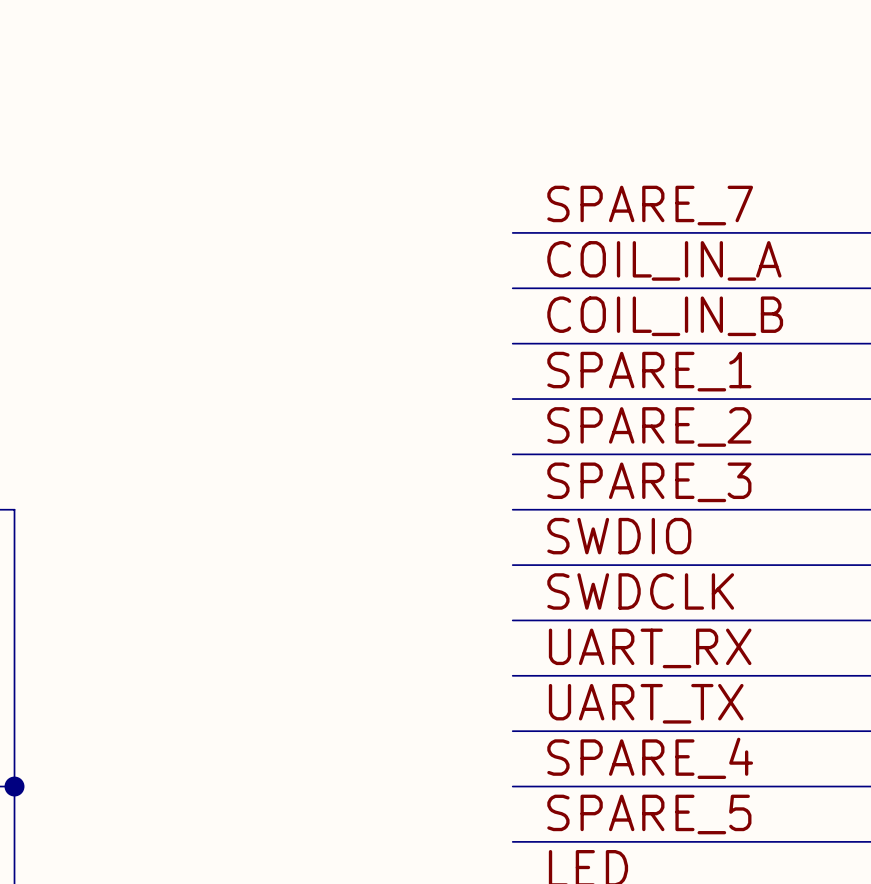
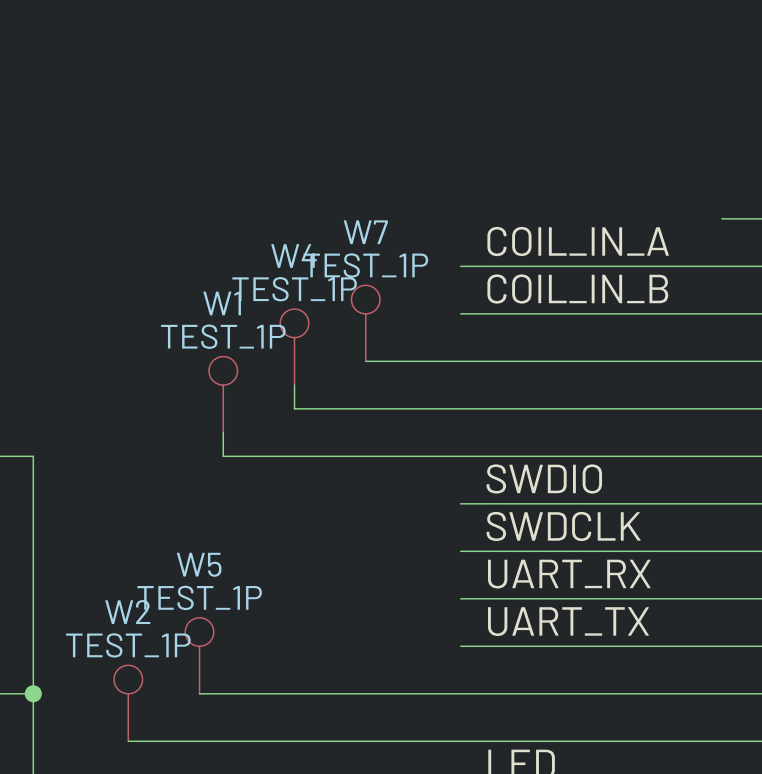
label: SPARE_7 (650, 205) -> none
wire: (512, 232) (817, 232) -> none
W7: none -> TEST_1P (365, 323)
label: SPARE_1 (649, 371) -> none
W4: none -> TEST_1P (294, 347)
wire: none -> (365, 361) (460, 361)
wire: none -> (294, 385) (294, 408) (460, 408)
label: SPARE_2 (649, 426) -> none
W1: none -> TEST_1P (223, 394)
wire: none -> (223, 432) (223, 456) (460, 456)
label: SPARE_3 (649, 482) -> none
W5: none -> TEST_1P (199, 655)
label: SPARE_4 (650, 758) -> none
wire: none -> (199, 693) (460, 693)
W2: none -> TEST_1P (128, 703)
label: SPARE_5 (649, 814) -> none
wire: none -> (128, 741) (460, 741)

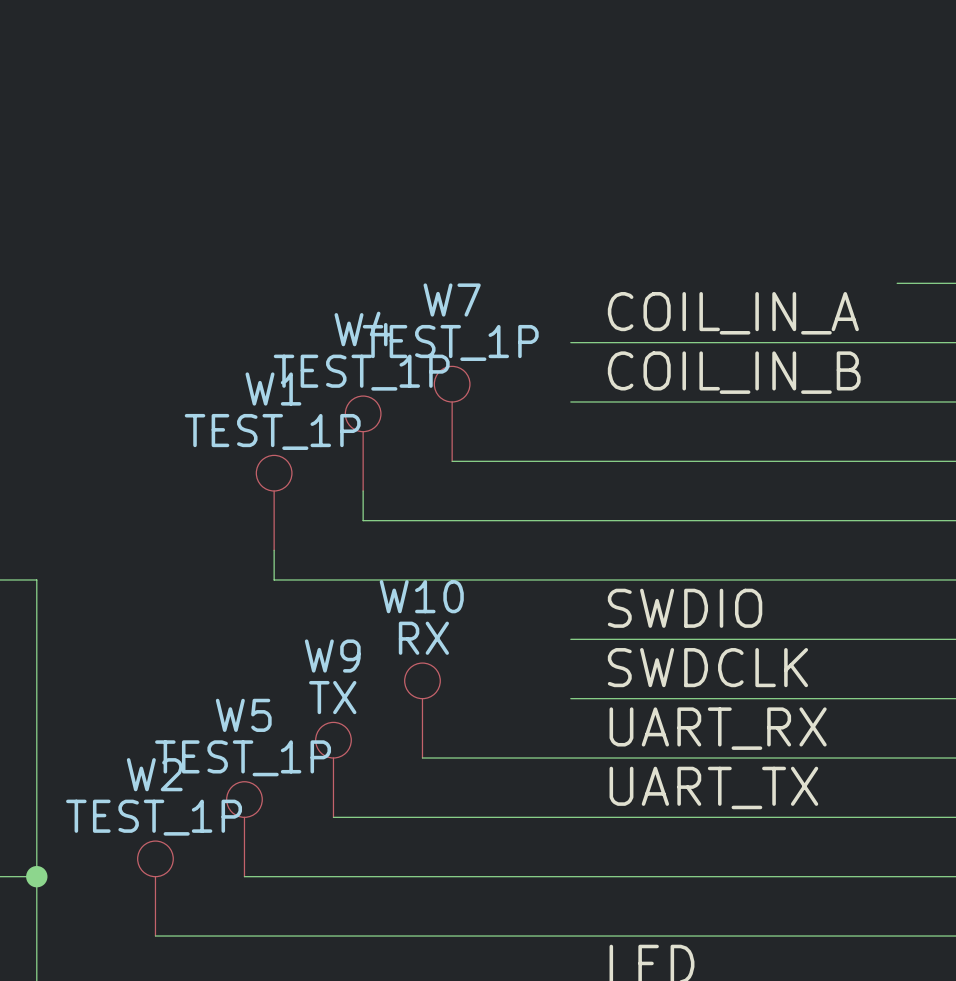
W10: none -> RX (422, 710)
wire: none -> (422, 758) (570, 758)
W9: none -> TX (333, 769)
wire: none -> (333, 817) (570, 817)

